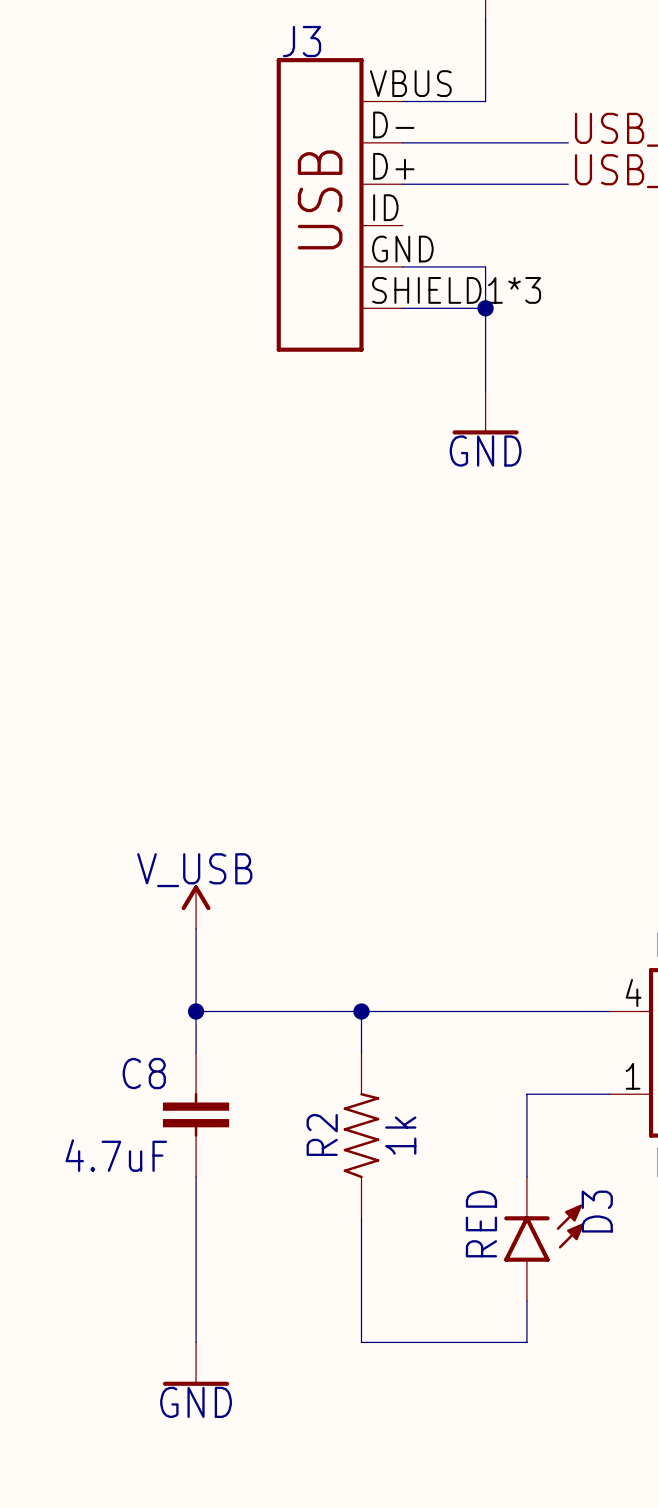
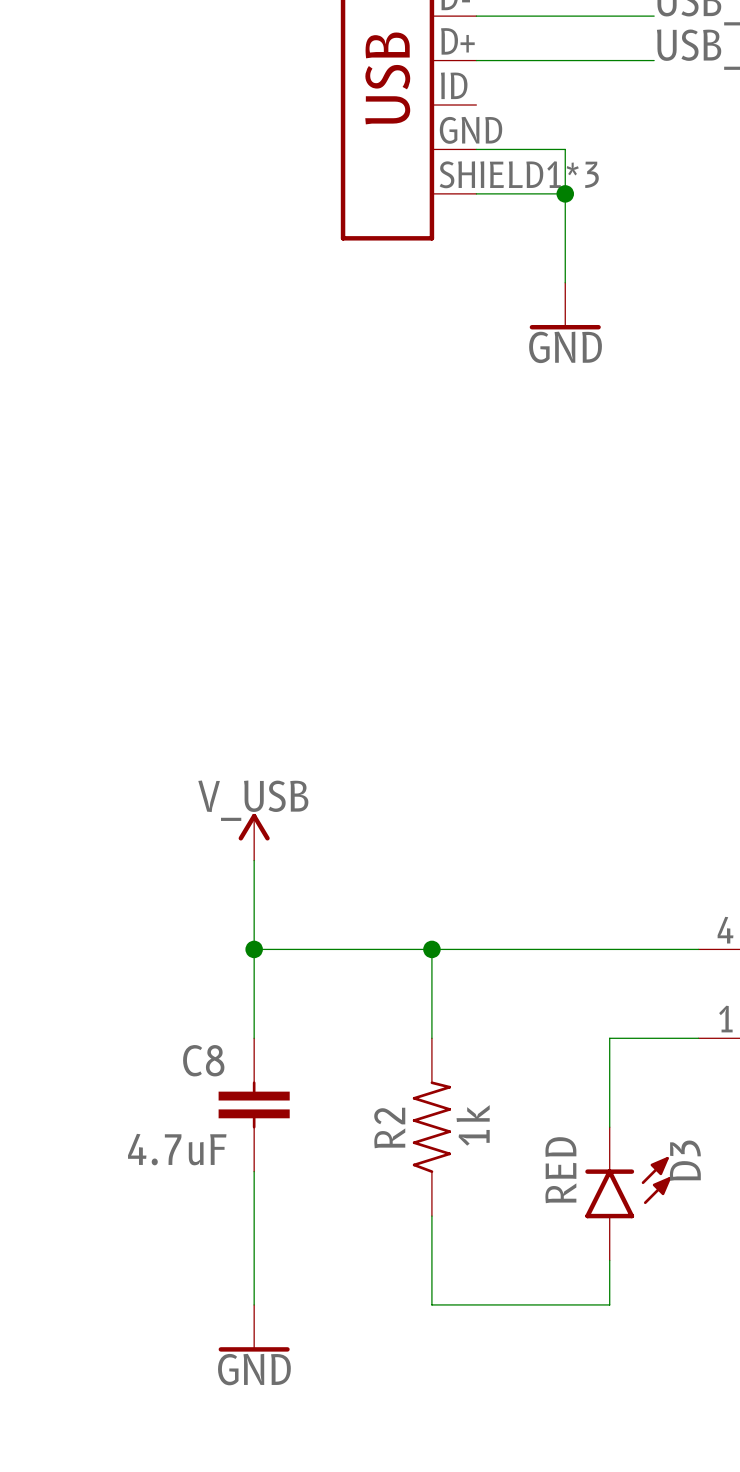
C8 position: (196, 1114) -> (254, 1104)
R2 position: (361, 1135) -> (431, 1127)

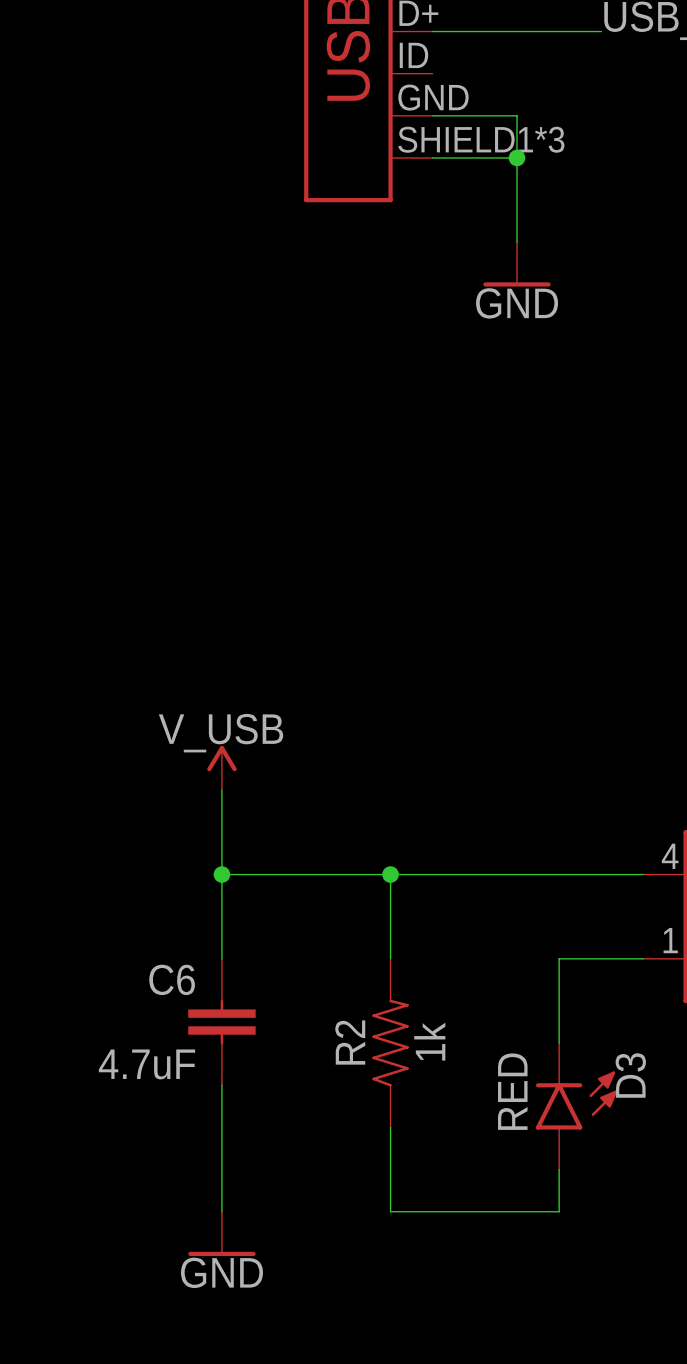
C8 name: C8 (203, 1060) -> C6 (172, 979)

